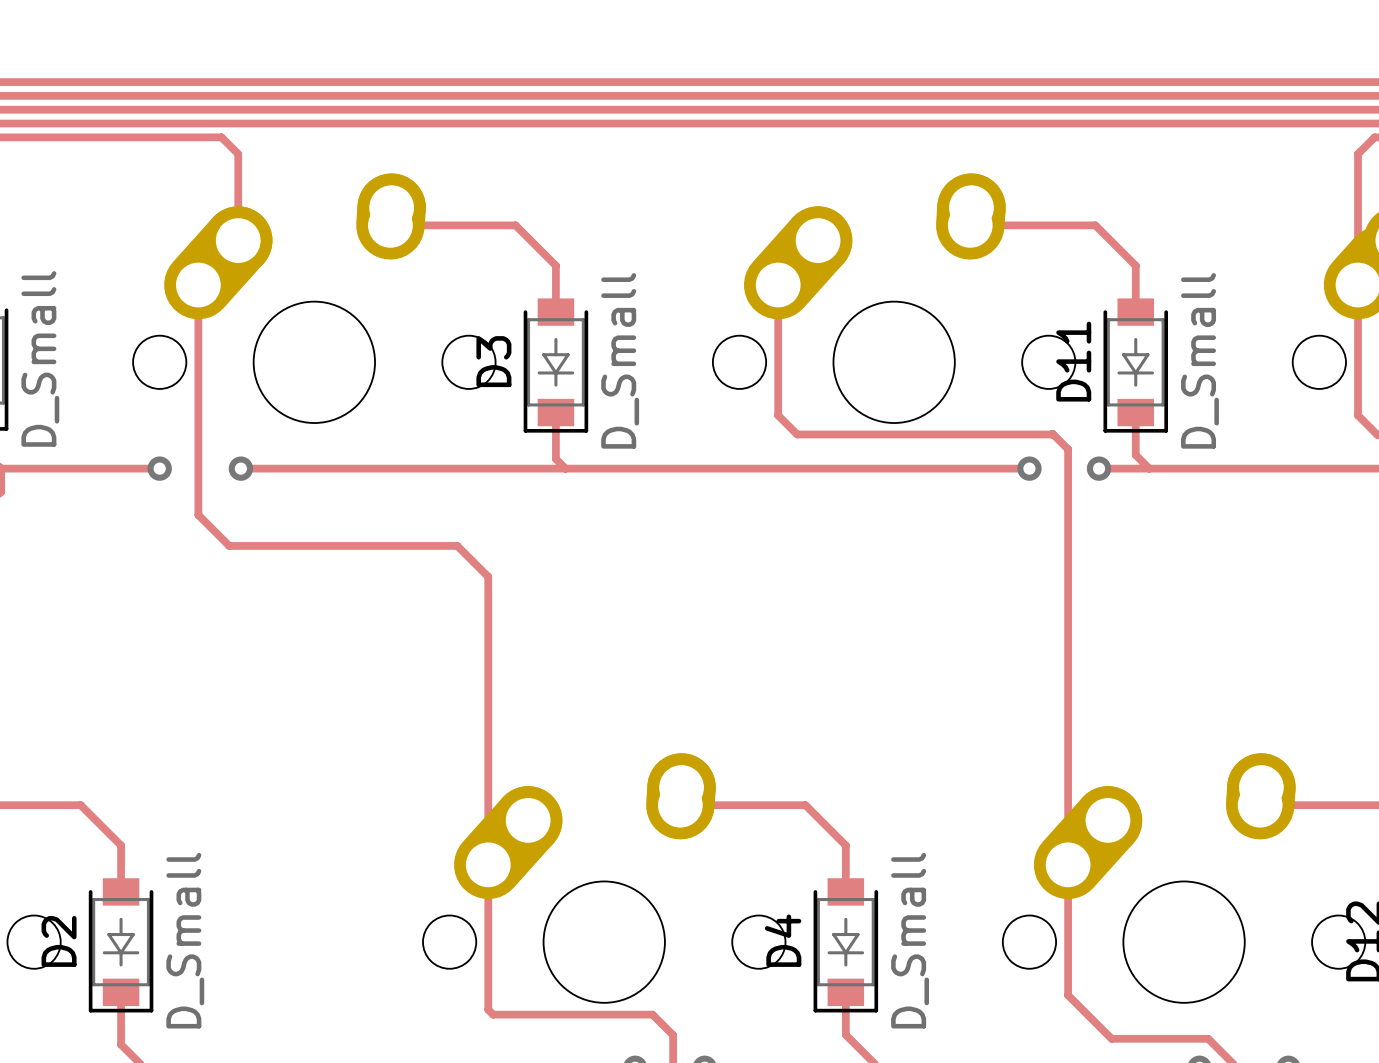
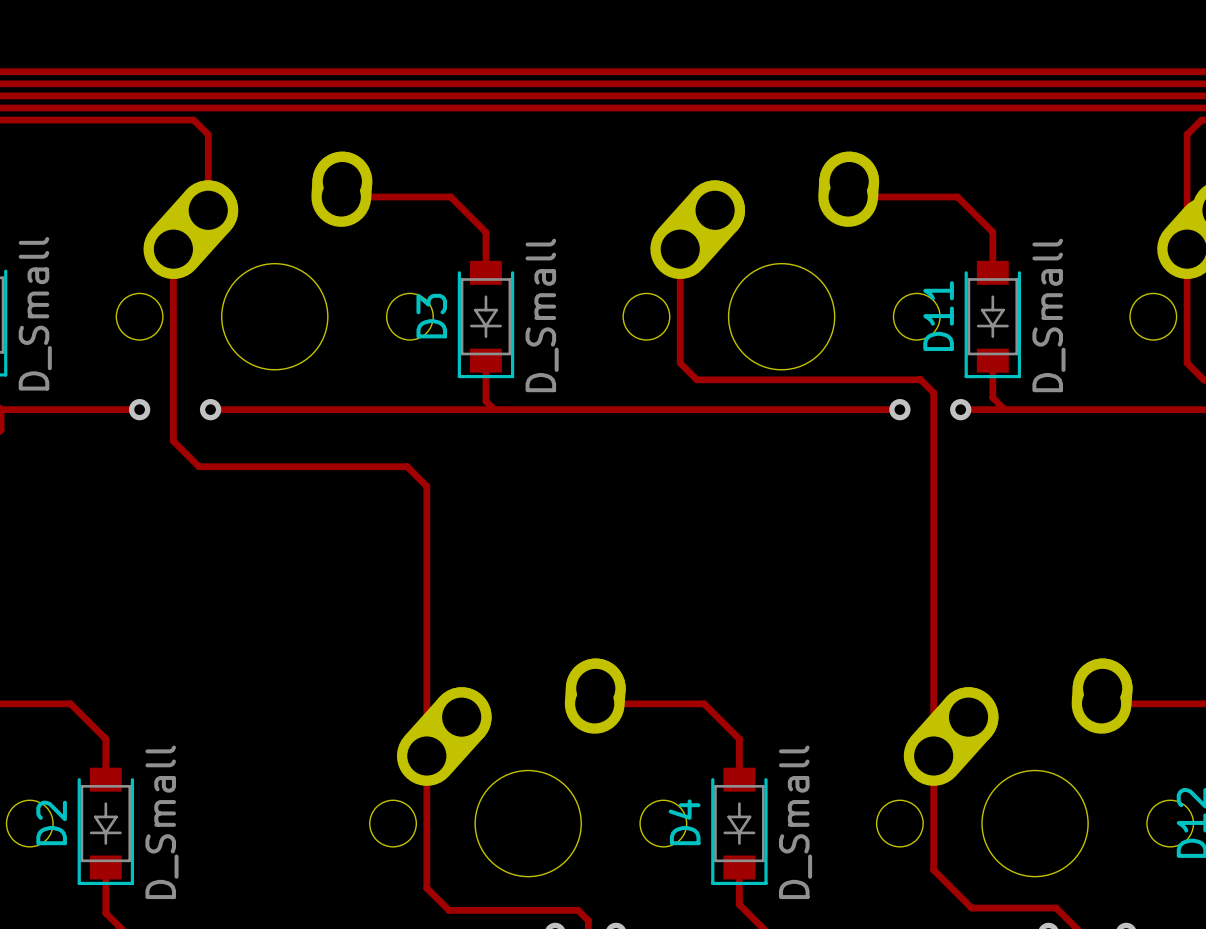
track: (198, 504) (198, 515) (229, 545) (457, 545) (488, 576) -> (173, 441) (198, 466) (407, 466) (426, 486) (426, 504)
track: (488, 1009) (493, 1014) (652, 1014) (673, 1035) (673, 1053) -> (426, 882) (426, 888) (449, 910) (578, 910) (588, 920)

